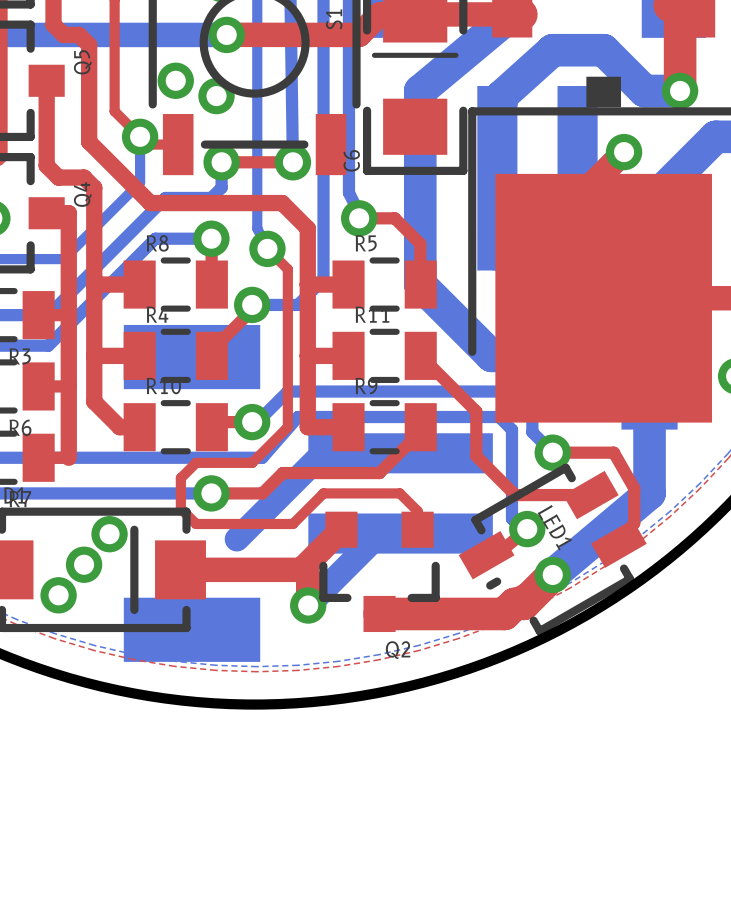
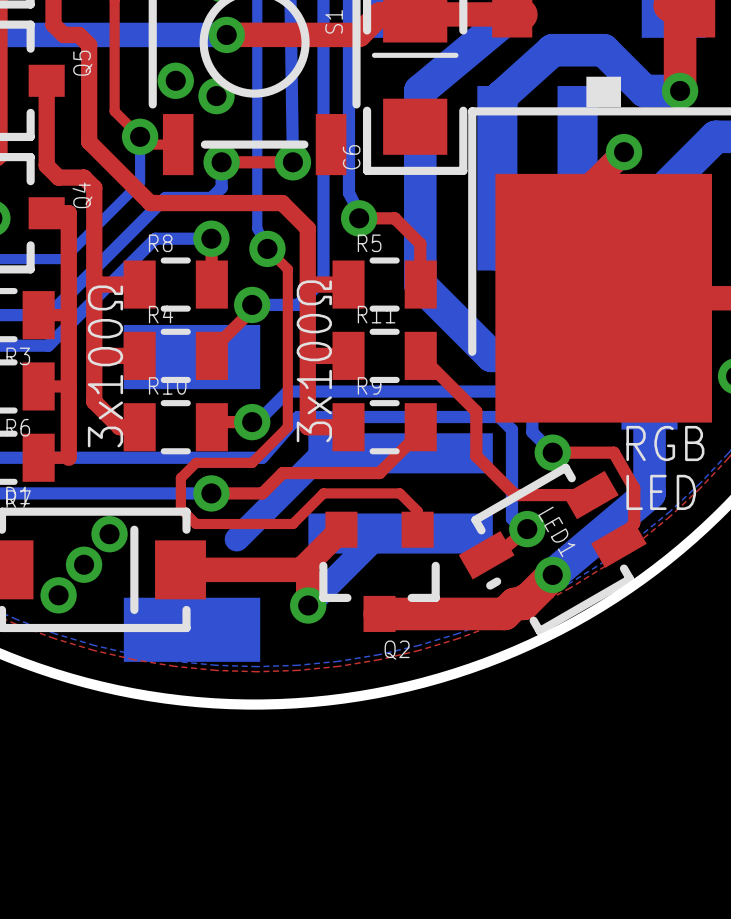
text: none -> 3x100Ω (314, 361)
text: none -> 3x100Ω (105, 366)
text: none -> RGB (665, 443)
text: none -> LED (661, 492)

